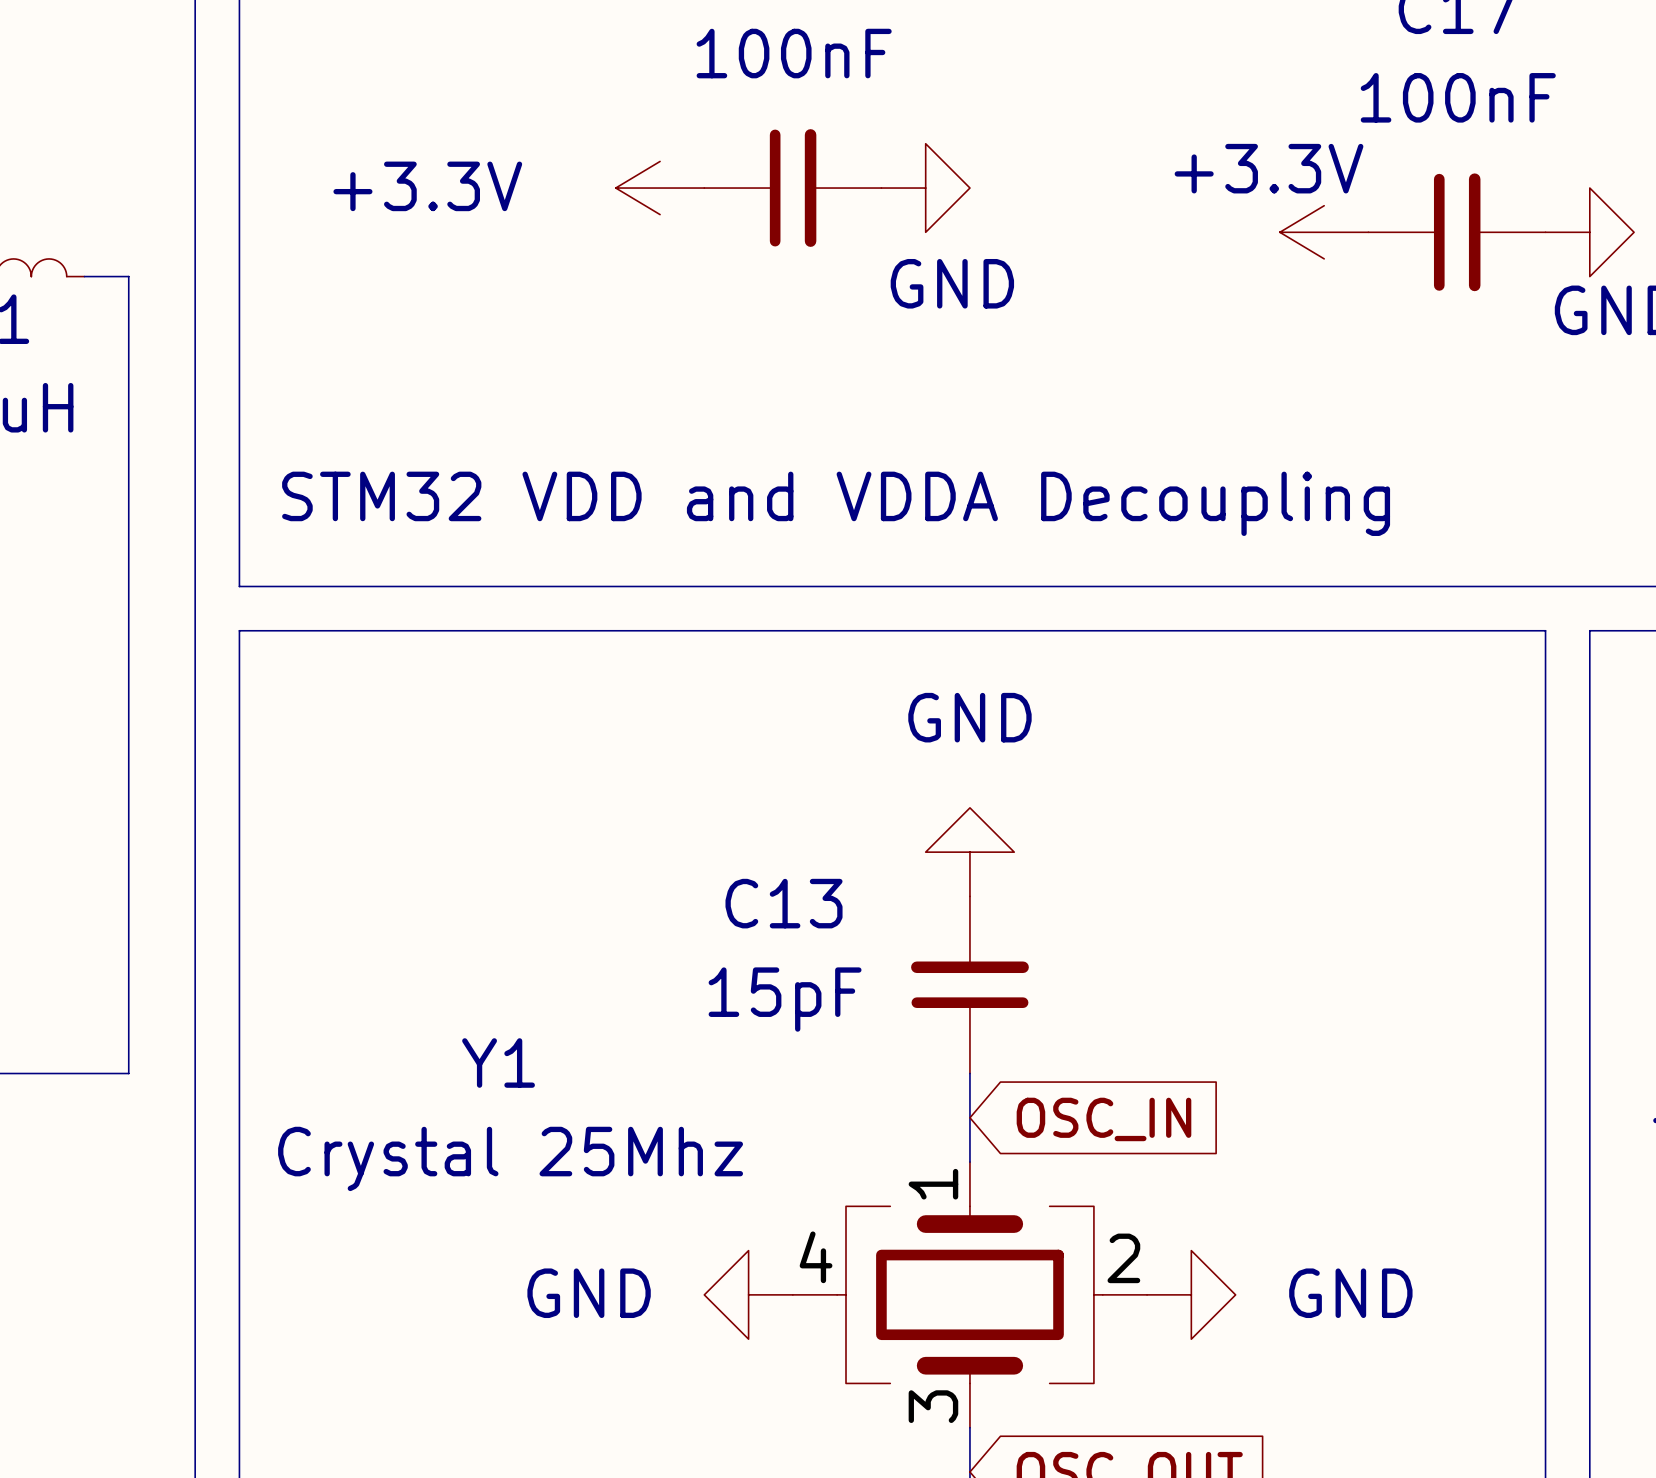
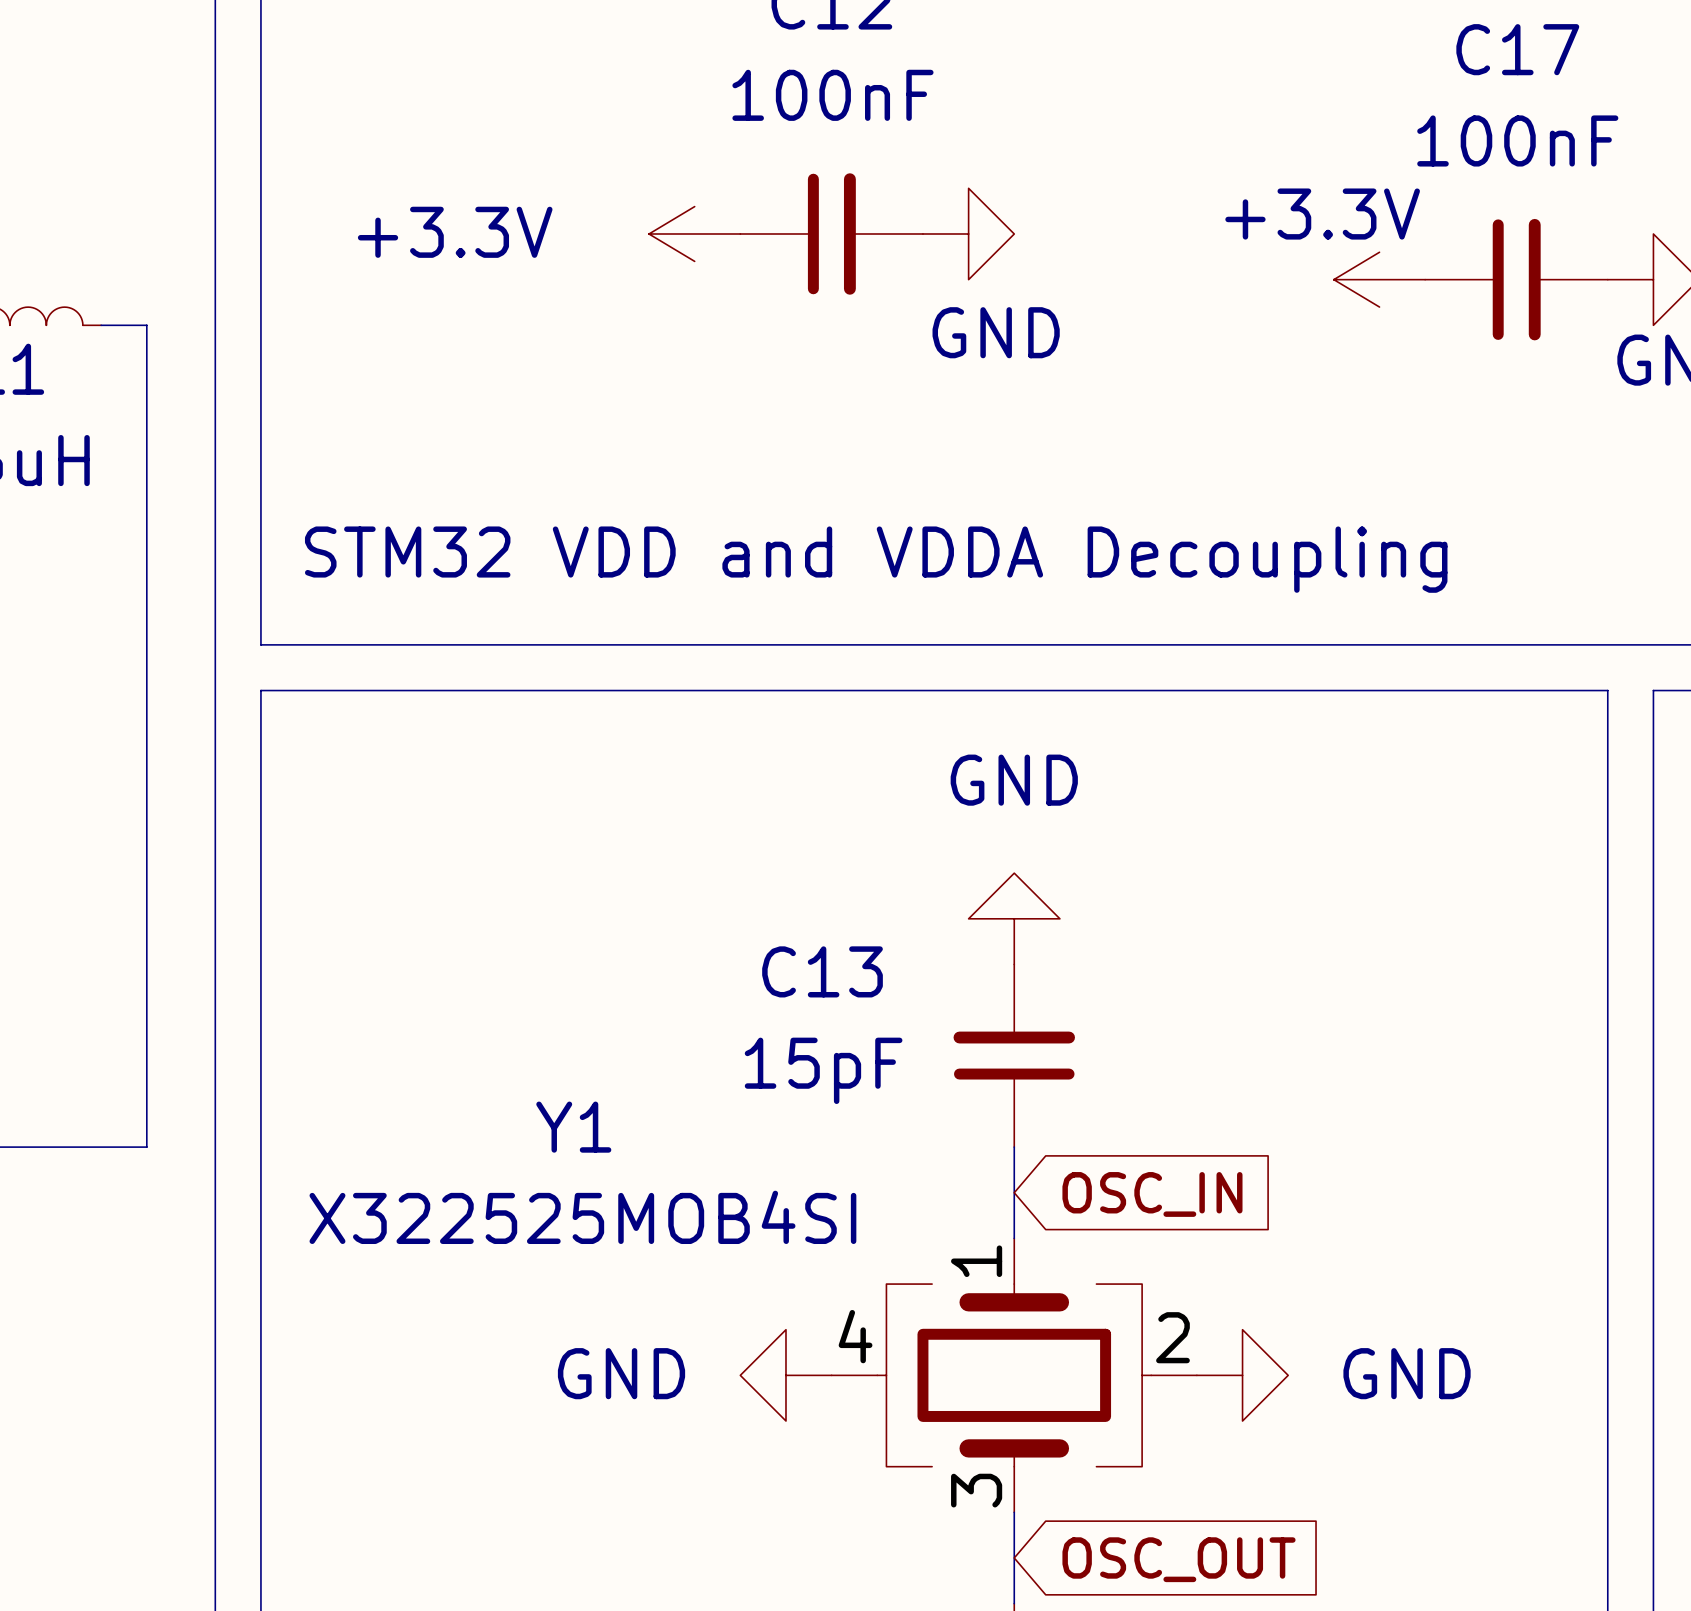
Y1 name position: Y1 (498, 1063) -> Y1 (573, 1127)
Y1 value: Crystal 25Mhz (510, 1158) -> X322525MOB4SI (582, 1217)

